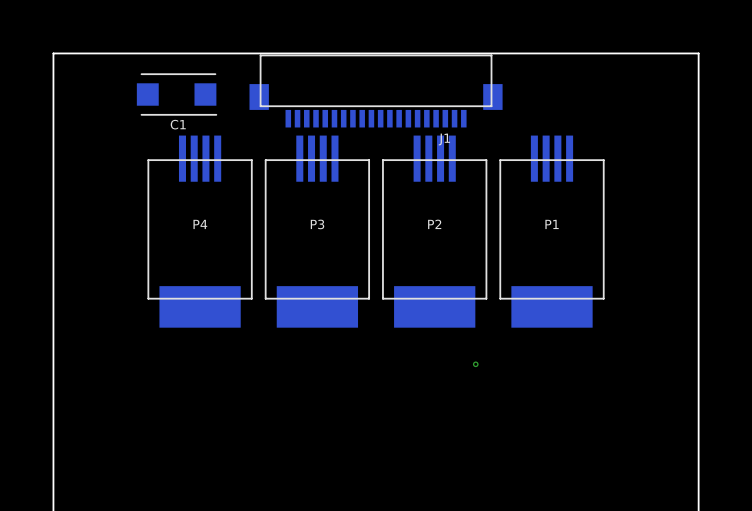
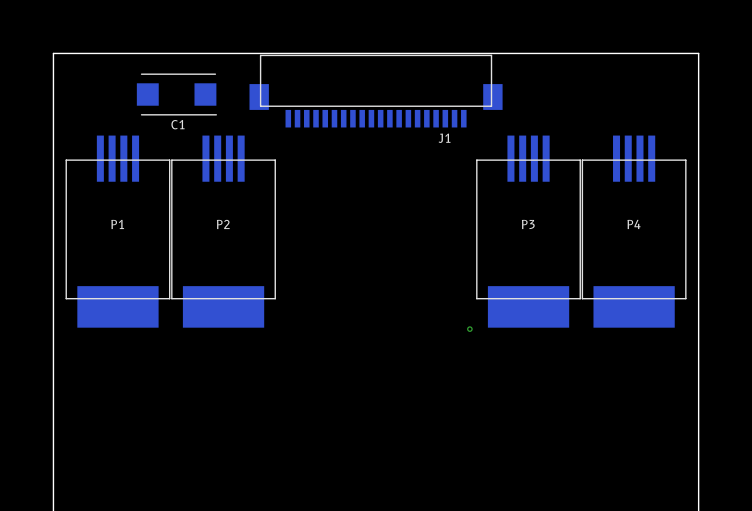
P4 position: (200, 231) -> (634, 231)
P3 position: (317, 231) -> (528, 231)
P2 position: (434, 231) -> (223, 231)
P1 position: (552, 231) -> (117, 231)
part position: (475, 364) -> (469, 329)

